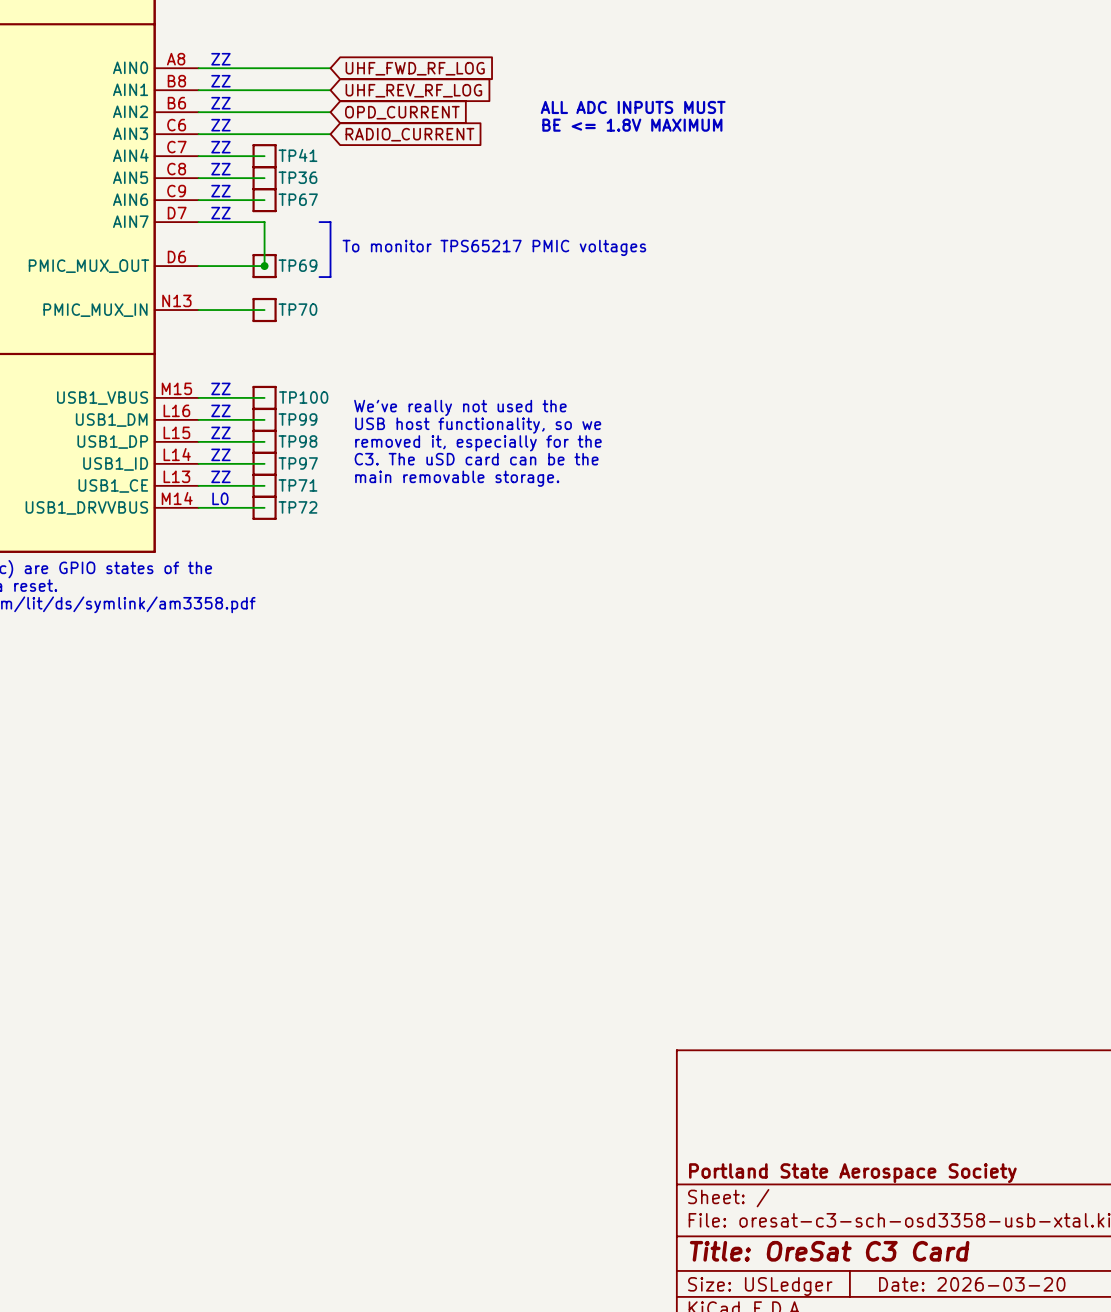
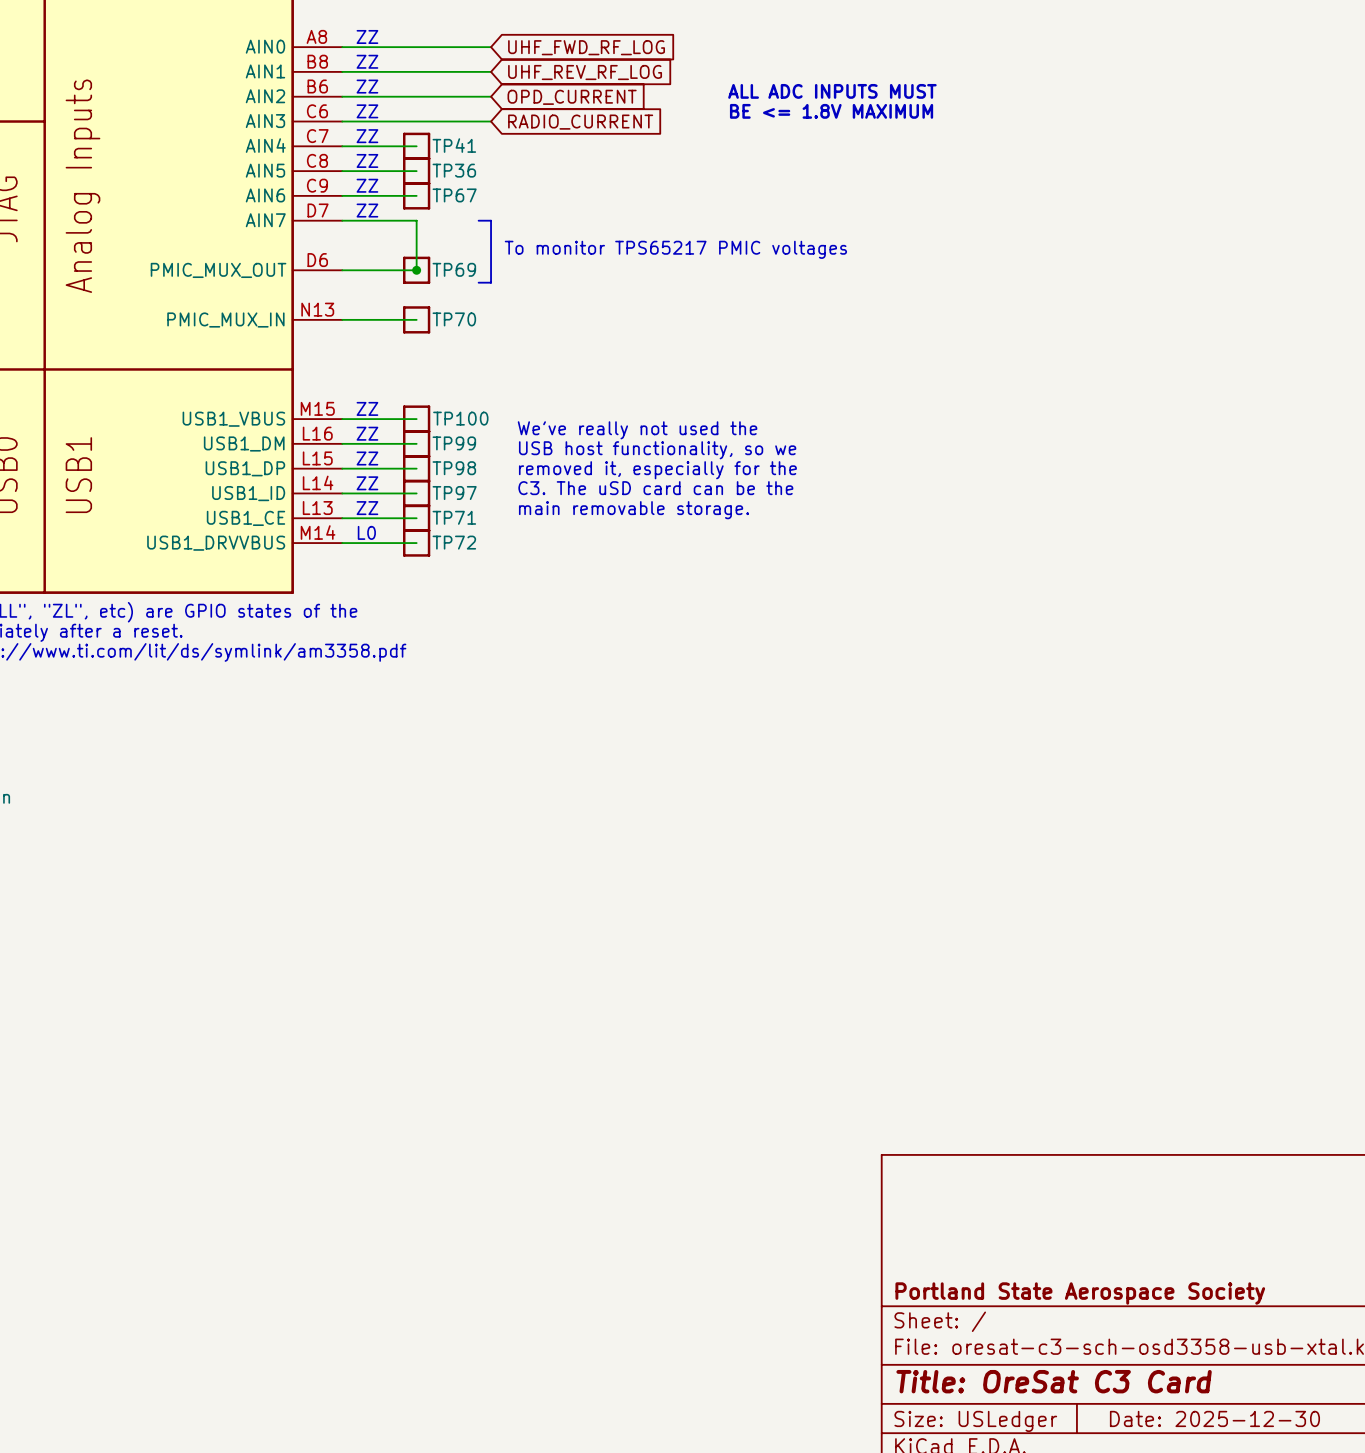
title block: Date: 2026-03-20 (972, 1284) -> Date: 2025-12-30 (1214, 1418)

